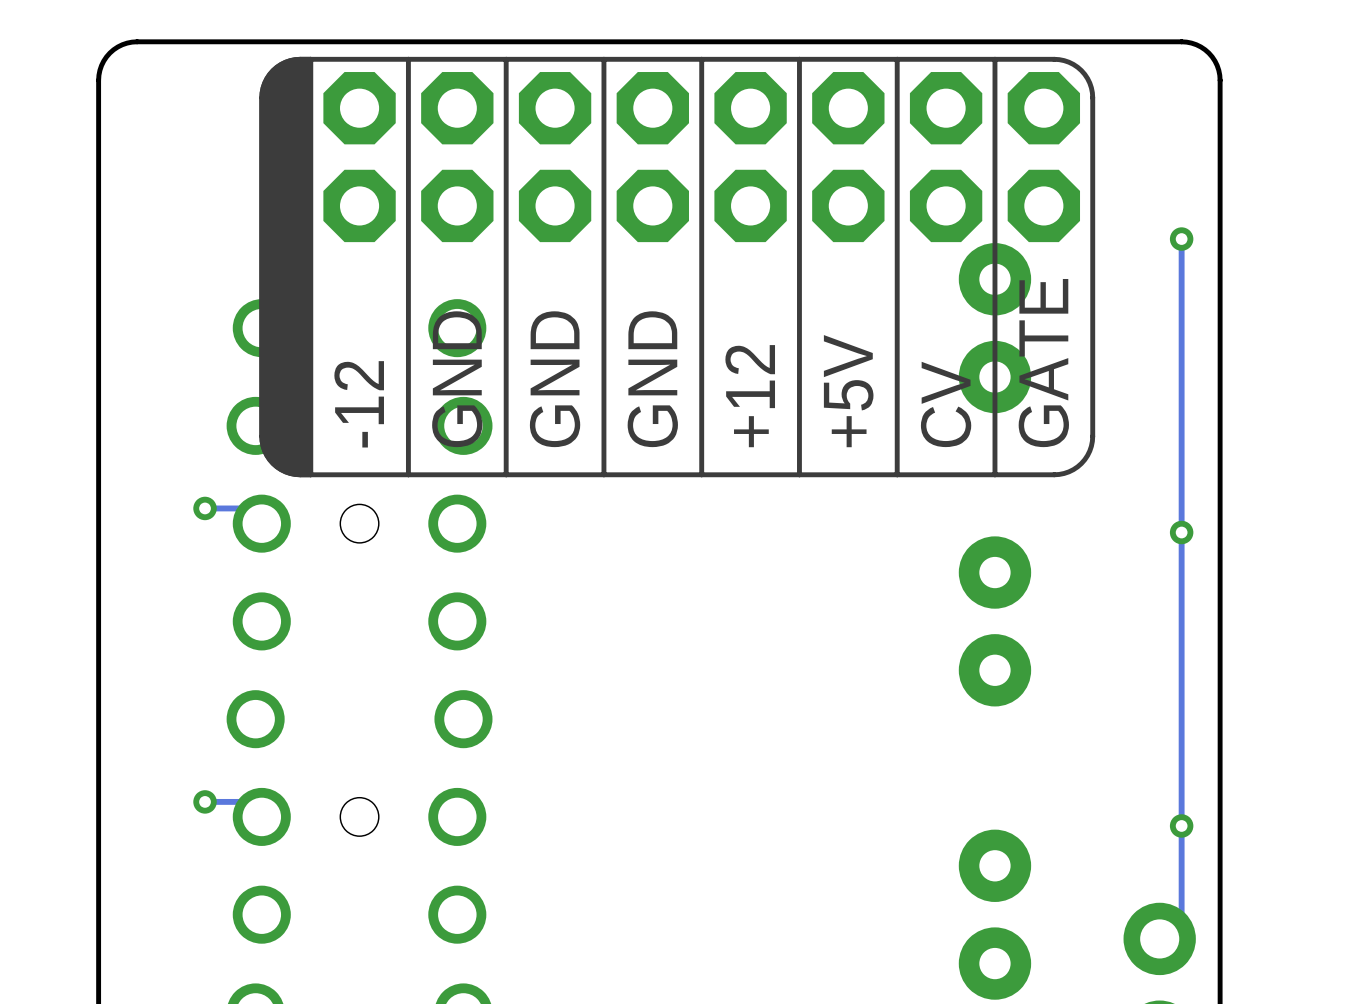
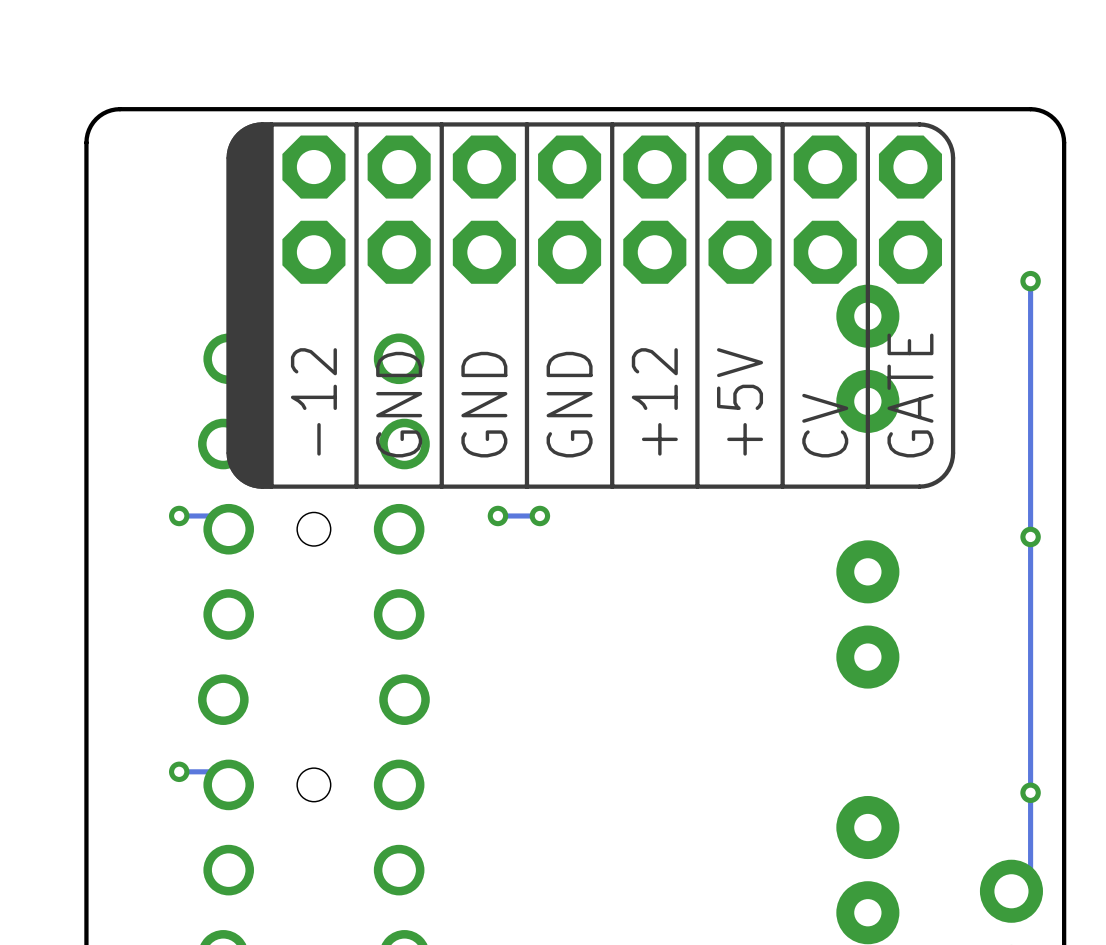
via: none -> (497, 515)
track: none -> (539, 515) (497, 515)
via: none -> (539, 515)

